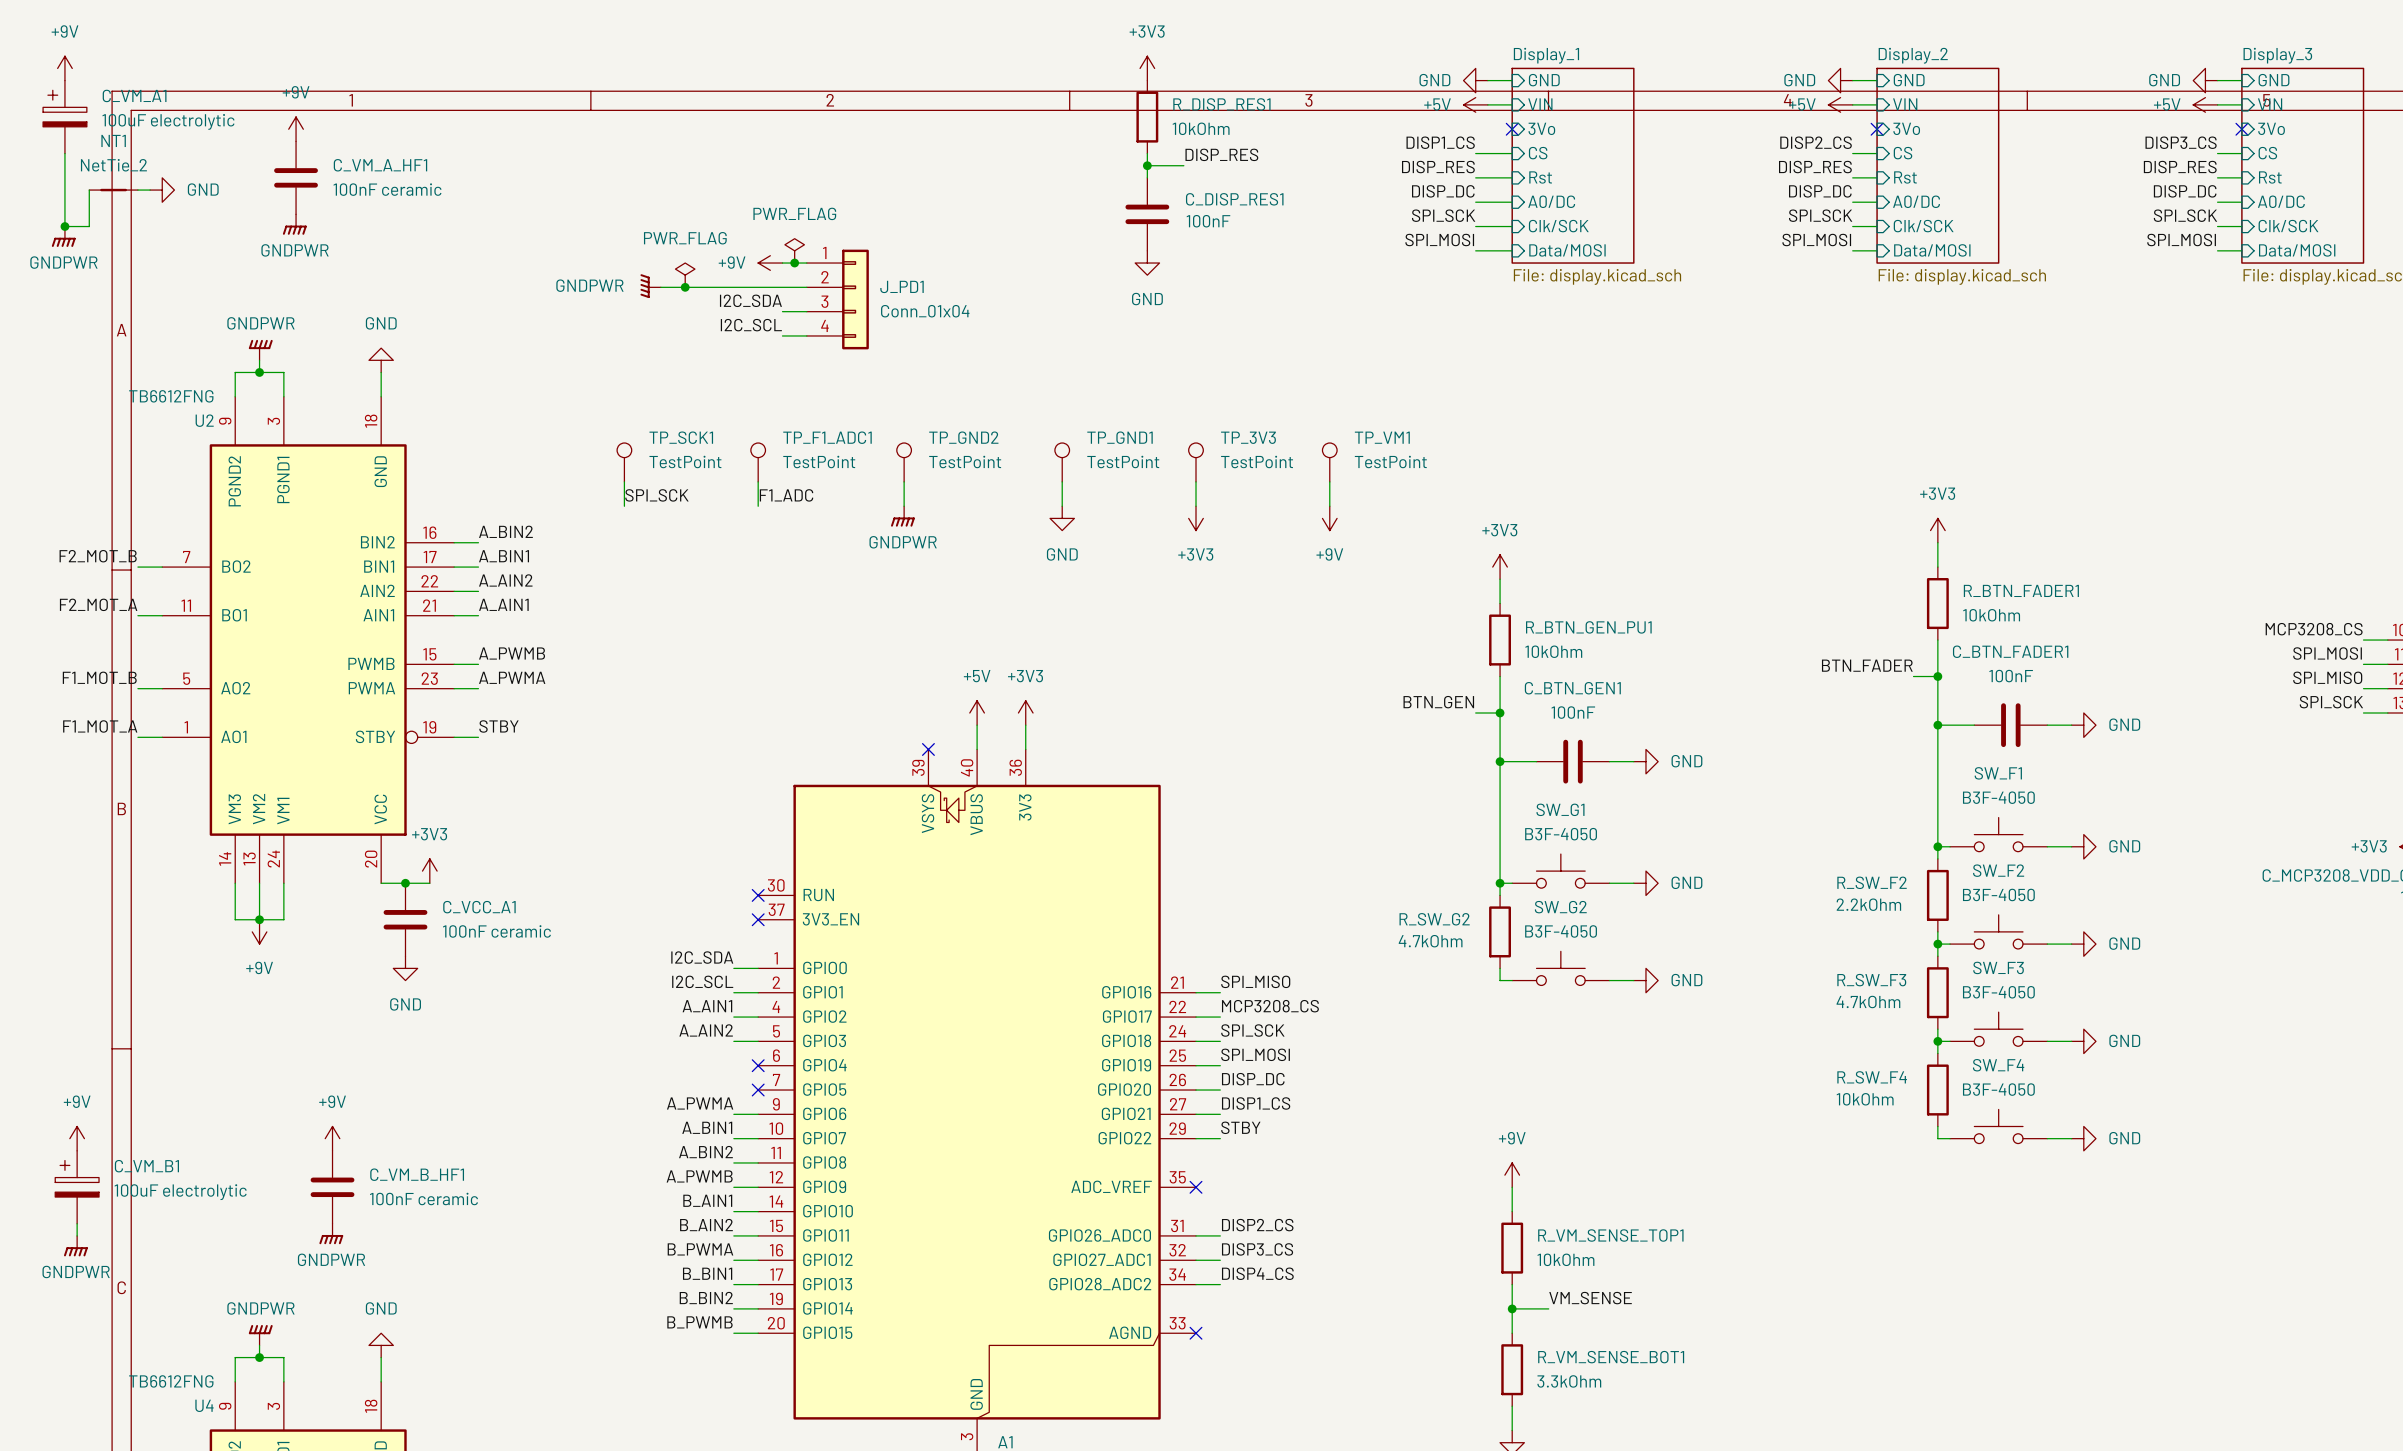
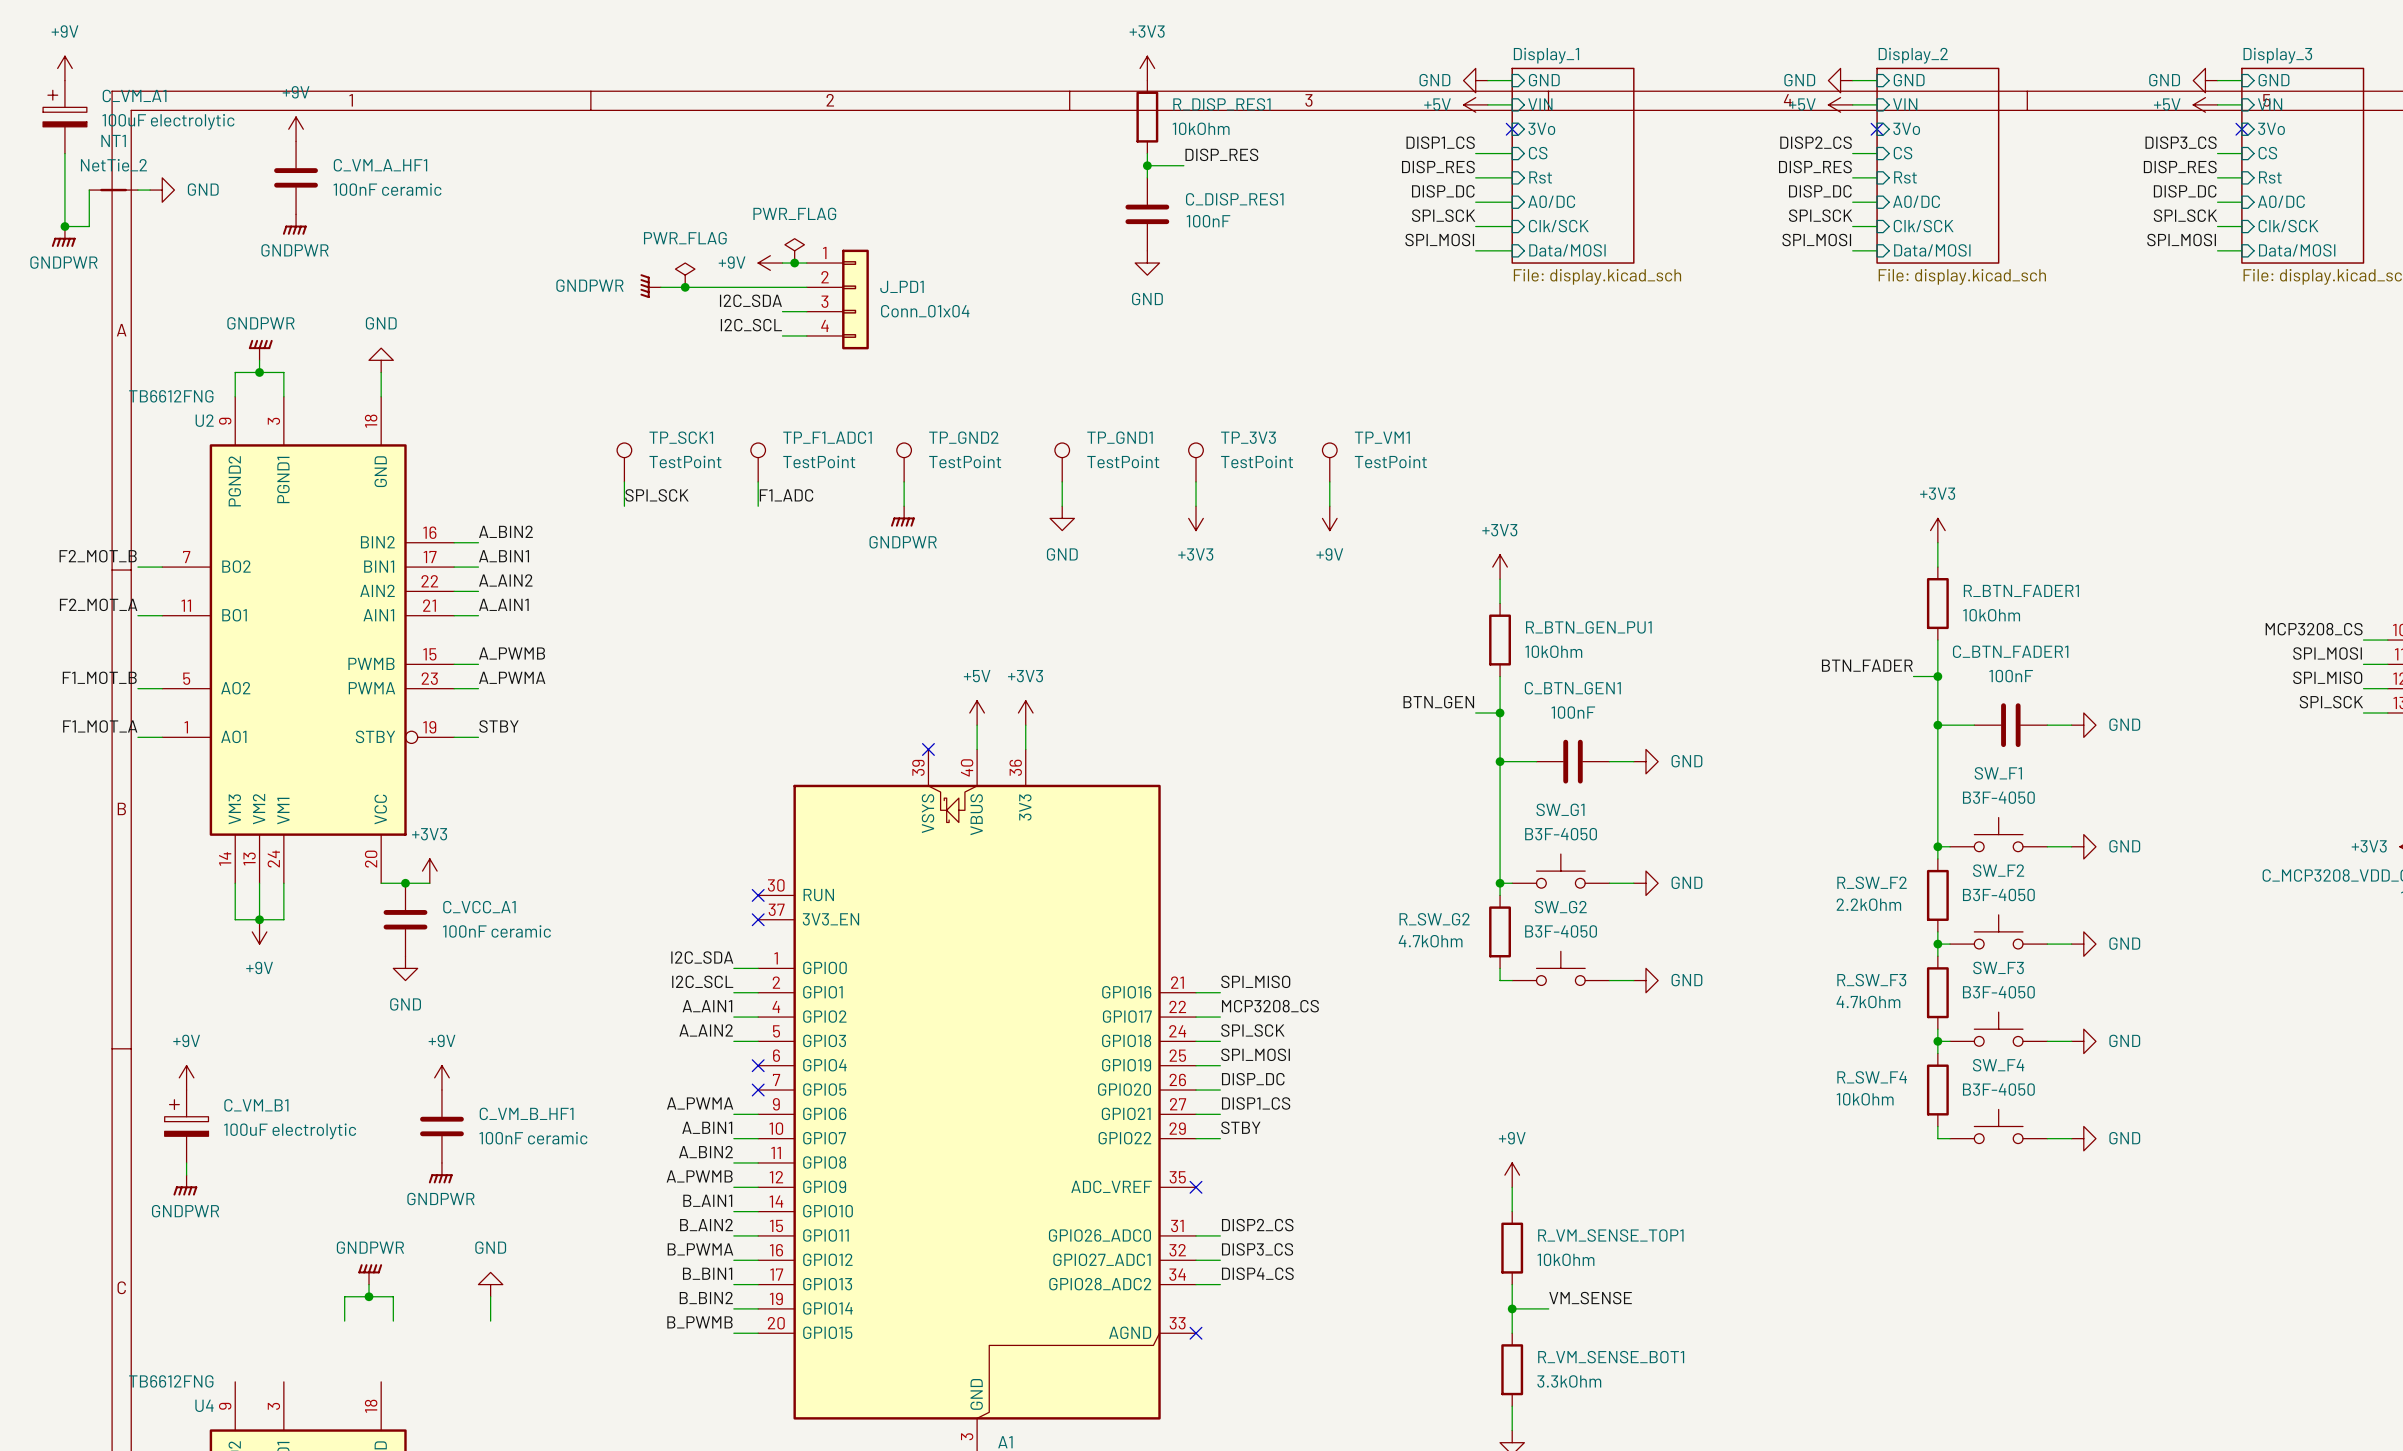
power symbol: none -> +9V (186, 1077)
power symbol: none -> +9V (441, 1077)
power symbol: +9V (77, 1138) -> none
power symbol: +9V (332, 1138) -> none
power symbol: none -> GNDPWR (440, 1173)
power symbol: none -> GNDPWR (185, 1185)
C_VM_B1 position: (77, 1187) -> (186, 1126)
C_VM_B_HF1 position: (332, 1187) -> (441, 1126)
wire: (77, 1223) (77, 1235) -> (186, 1162) (186, 1175)
power symbol rotation: 0° (331, 1234) -> 180° (370, 1274)
power symbol position: GNDPWR (331, 1234) -> GNDPWR (370, 1274)
power symbol: GNDPWR (75, 1246) -> none
junction: none -> (369, 1296)
power symbol: GNDPWR (260, 1335) -> none
wire: (259, 1345) (259, 1357) -> (369, 1284) (369, 1296)
power symbol position: GND (381, 1345) -> GND (490, 1284)
junction: (259, 1357) -> none
wire: (381, 1357) (381, 1381) -> (490, 1296) (490, 1321)
wire: (235, 1381) (235, 1357) (283, 1357) (283, 1381) -> (344, 1321) (344, 1296) (393, 1296) (393, 1321)

